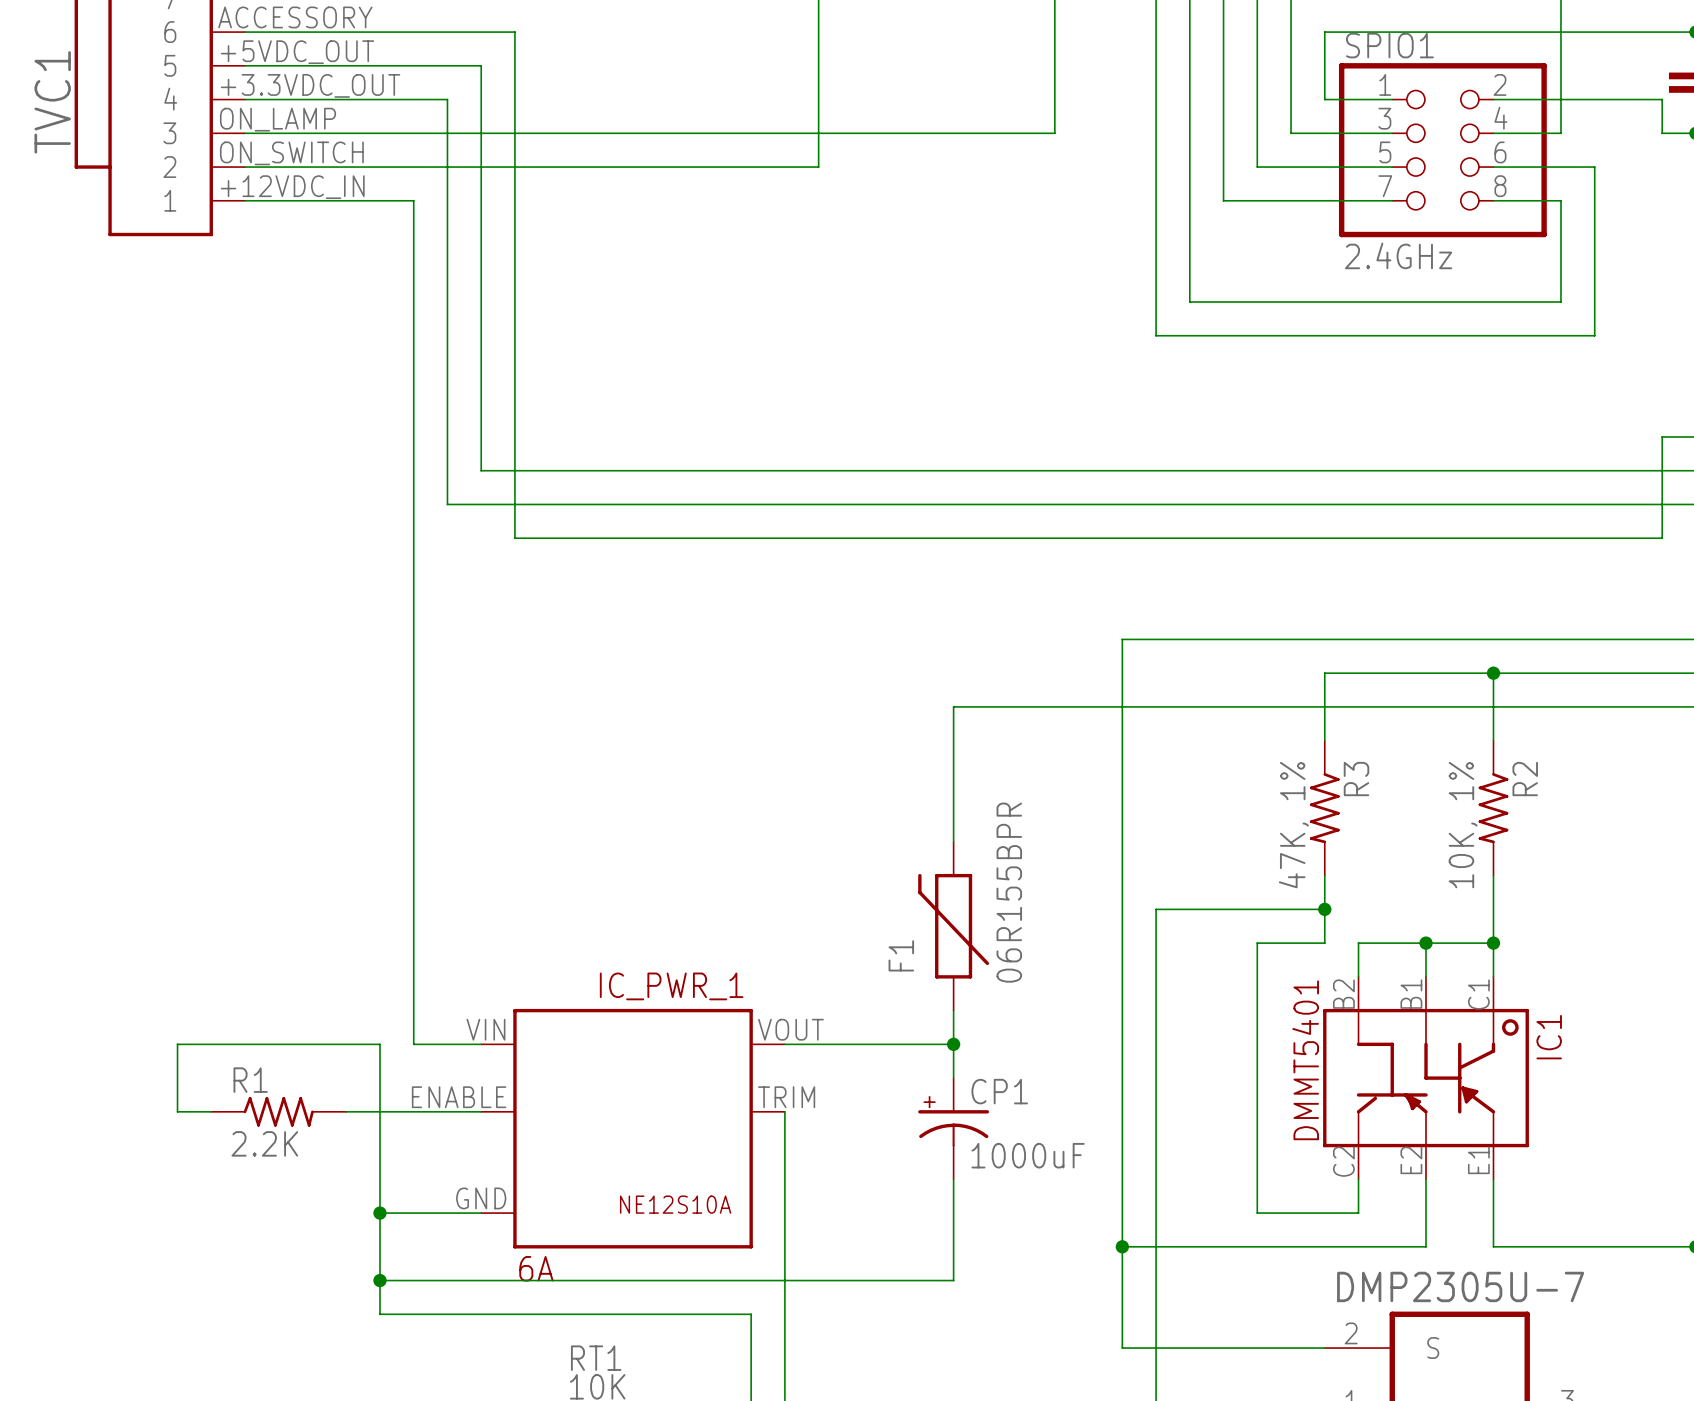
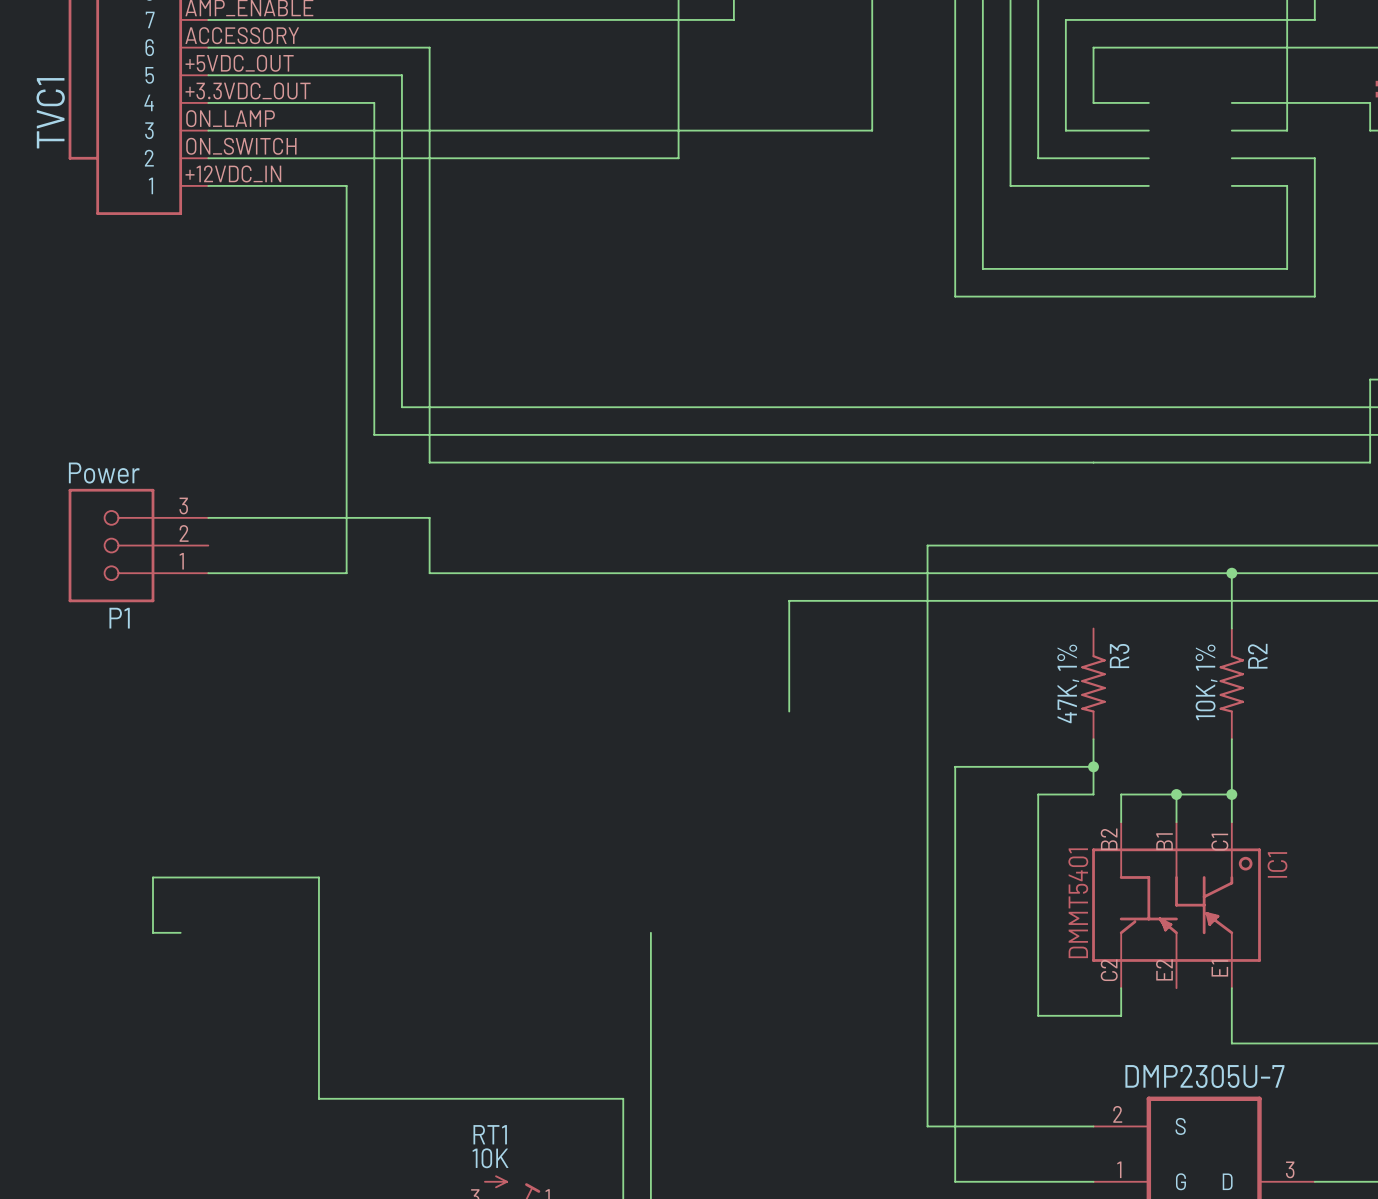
SPIO1: 2.4GHz (1442, 150) -> none
P1: none -> Power (138, 545)
wire: (413, 673) (413, 1044) (481, 1044) -> (346, 573) (208, 573)
wire: (1324, 673) (1324, 740) -> (1093, 573) (429, 573) (429, 517) (208, 517)
F1: 06R155BPR (953, 926) -> none
wire: (953, 1010) (953, 1078) -> none
wire: (784, 1044) (953, 1044) -> none
junction: (953, 1044) -> none
R1: 2.2K (278, 1111) -> none
wire: (346, 1111) (481, 1111) -> none
IC_PWR_1: 6A (633, 1128) -> none
CP1: 1000uF (953, 1128) -> none
wire: (953, 1179) (953, 1280) (379, 1280) -> none
wire: (1426, 1179) (1426, 1246) (1122, 1246) -> none
wire: (379, 1213) (481, 1213) -> none
junction: (379, 1213) -> none
junction: (1122, 1246) -> none
junction: (379, 1280) -> none

